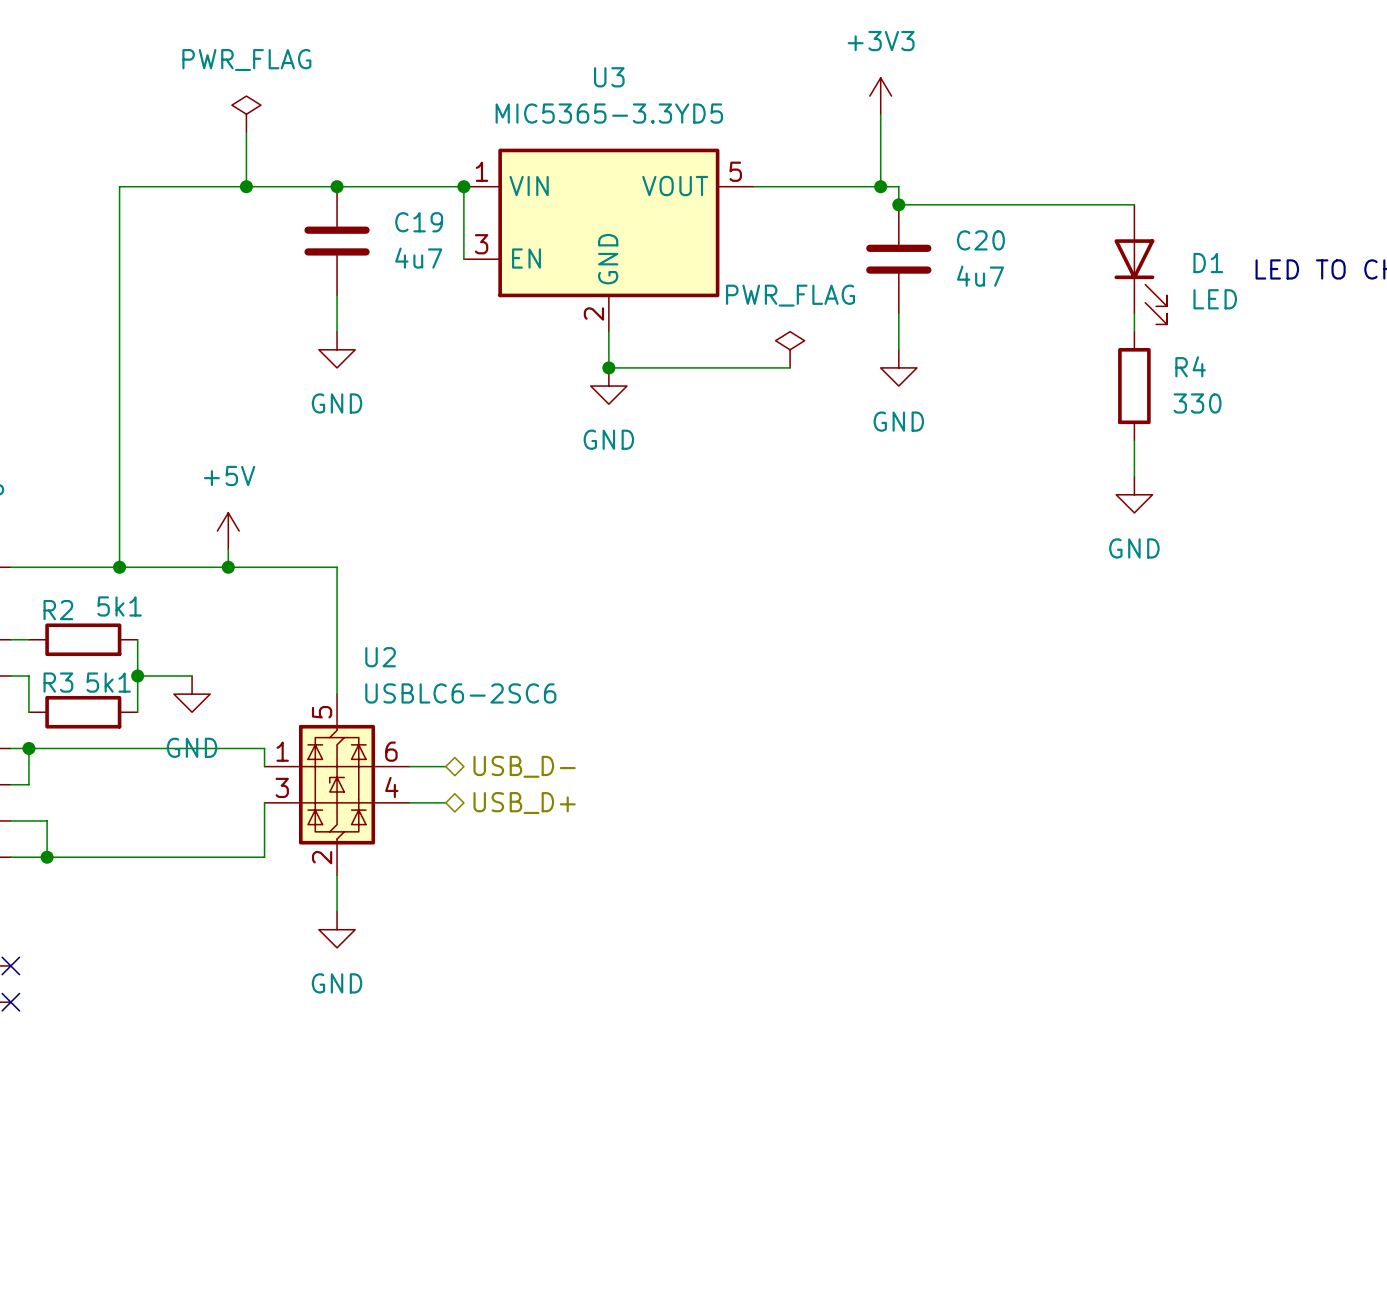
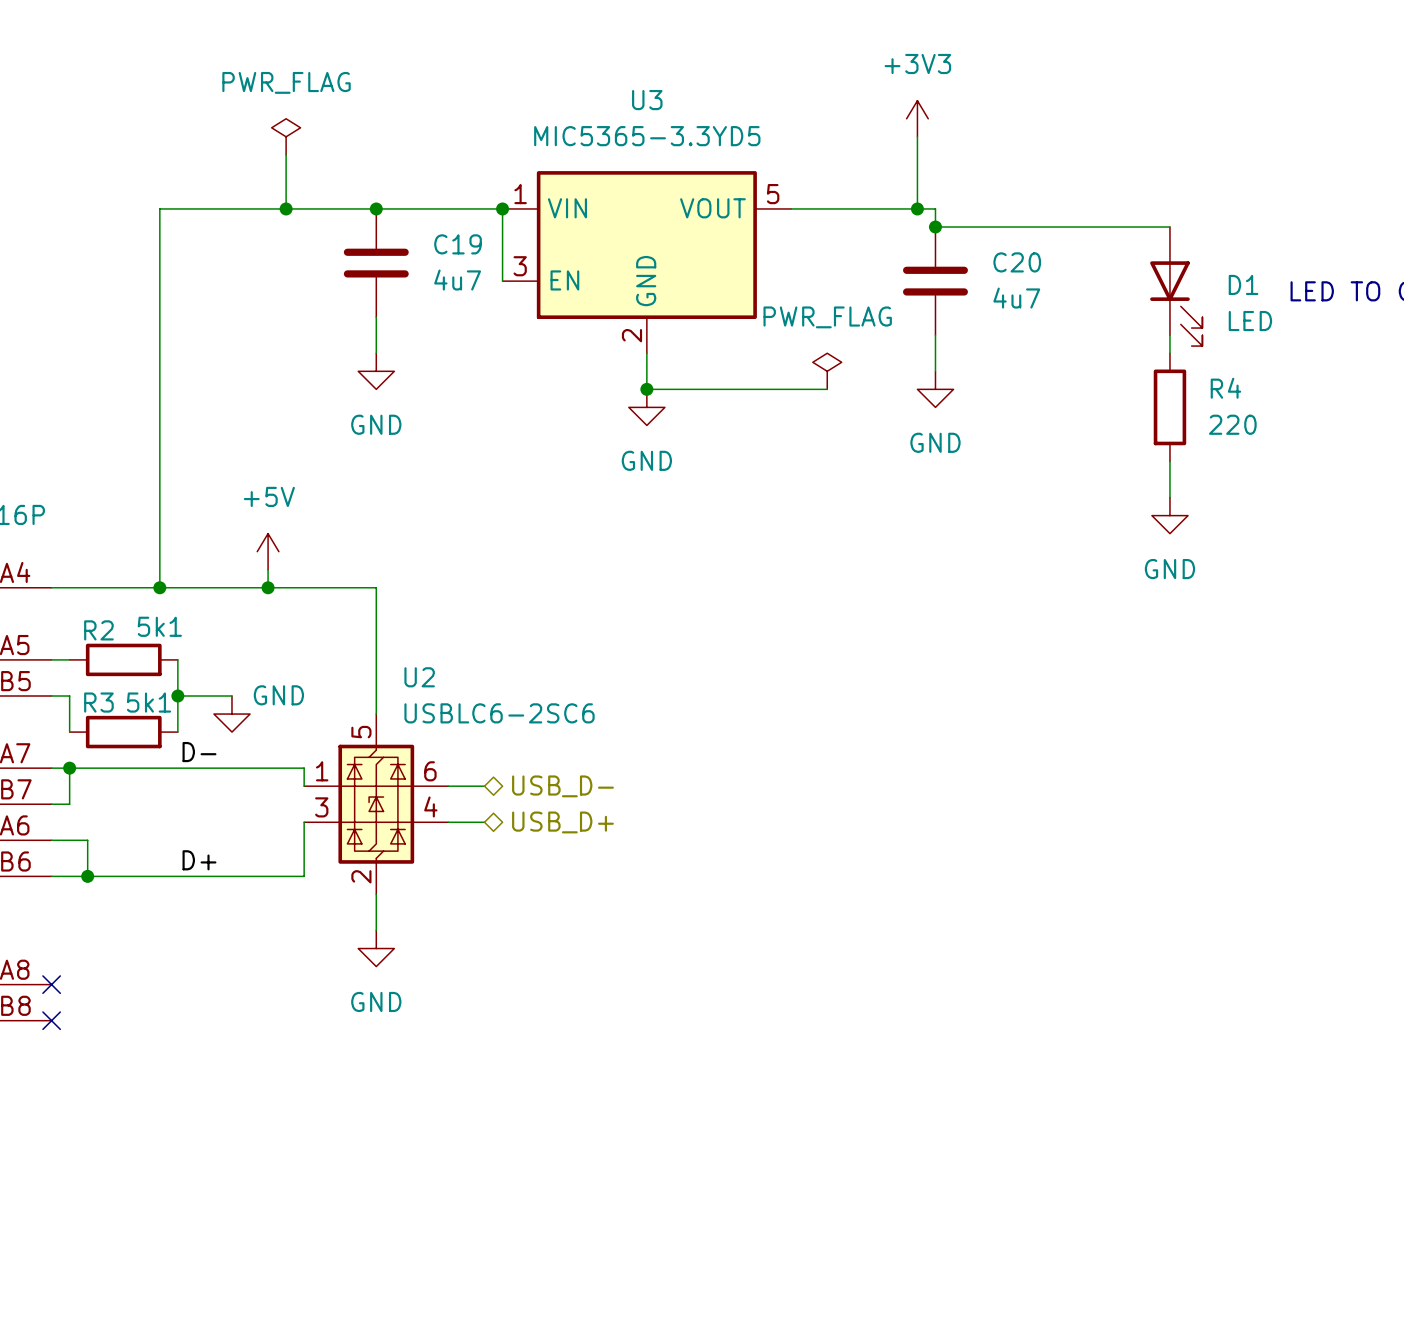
R4 value: 330 (1197, 403) -> 220 (1232, 424)
label: none -> D- (199, 752)
power symbol text position: GND (192, 747) -> GND (278, 695)
label: none -> D+ (199, 860)

